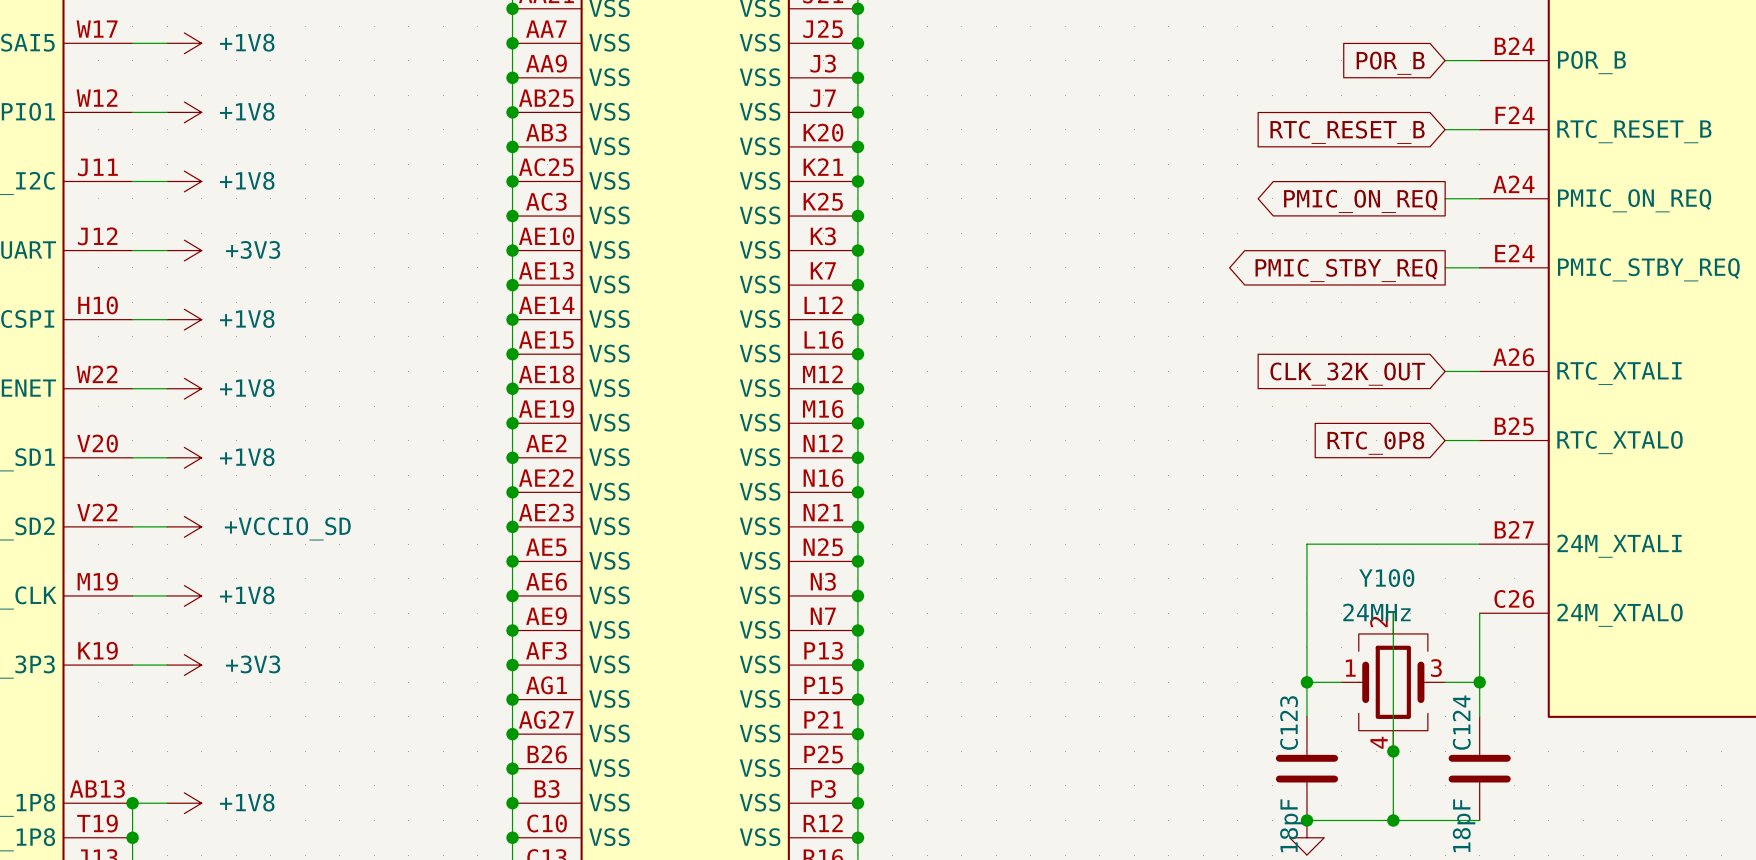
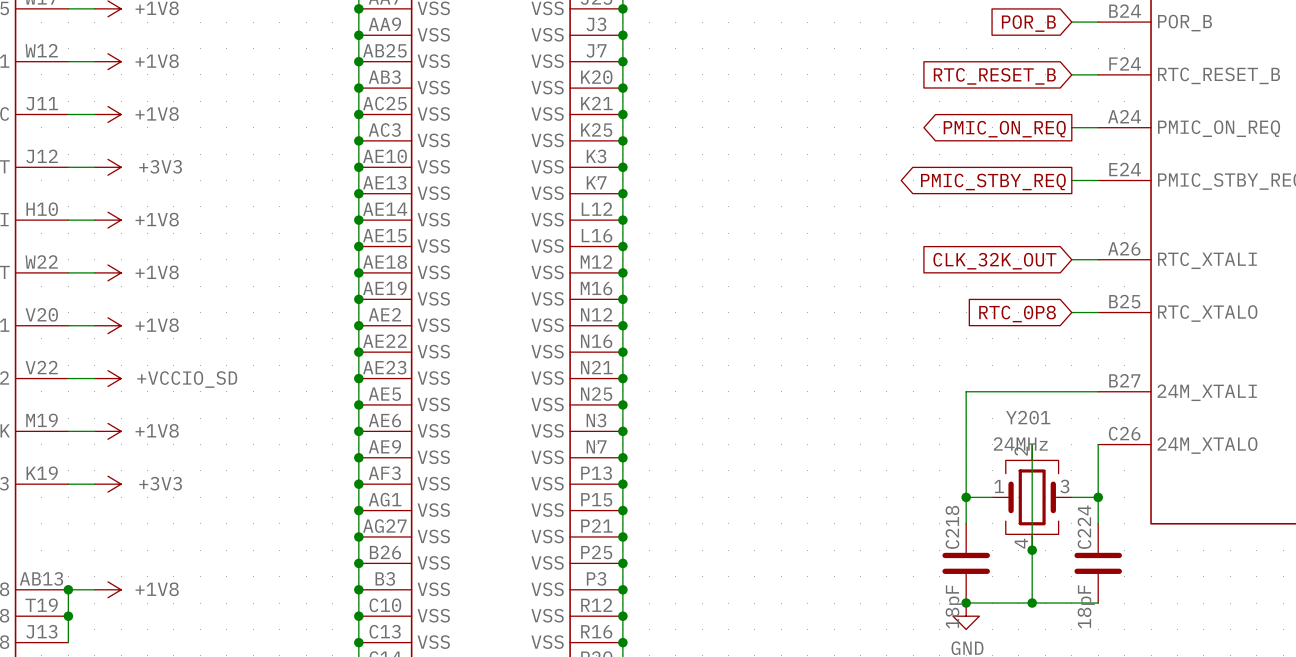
Y100 name: Y100 (1386, 578) -> Y201 (1028, 417)
C123 name: C123 (1289, 722) -> C218 (952, 527)
C124 name: C124 (1461, 722) -> C224 (1084, 527)

